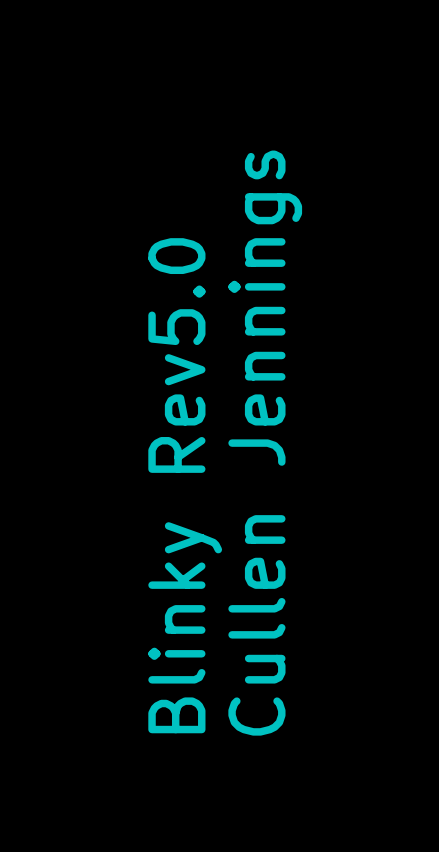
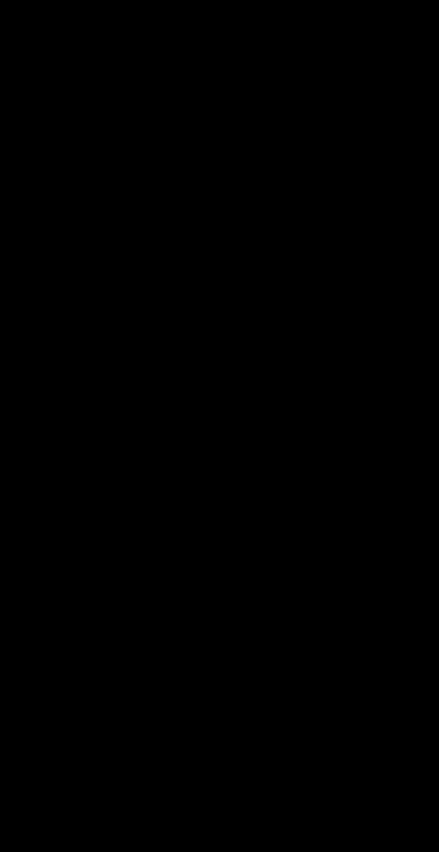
text: Cullen Jennings (265, 443) -> none
text: Blinky Rev5.0 (185, 485) -> none

